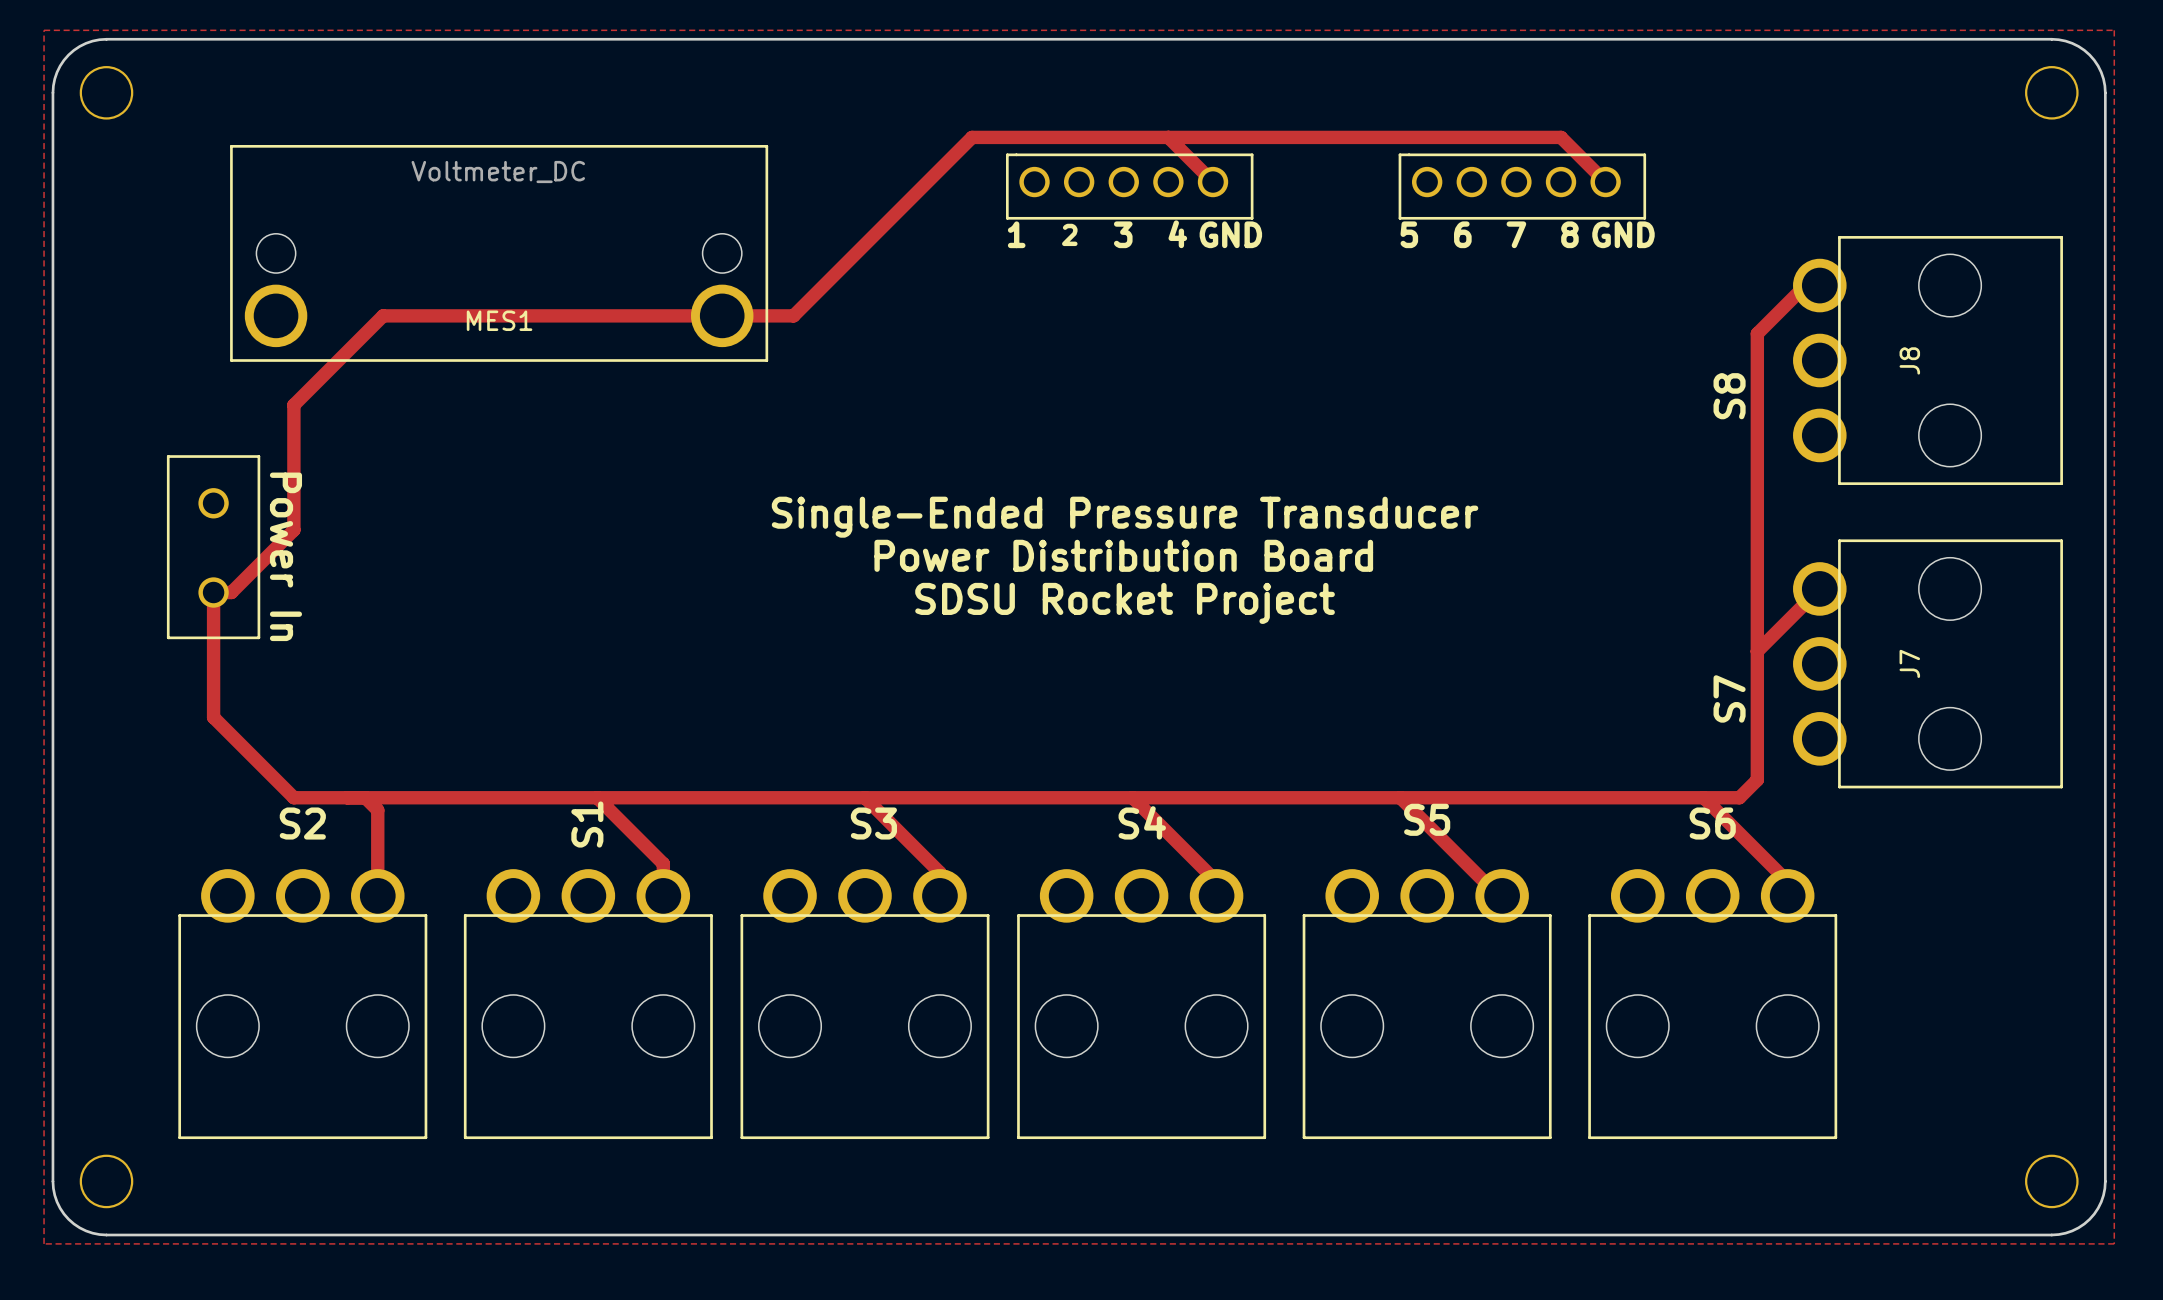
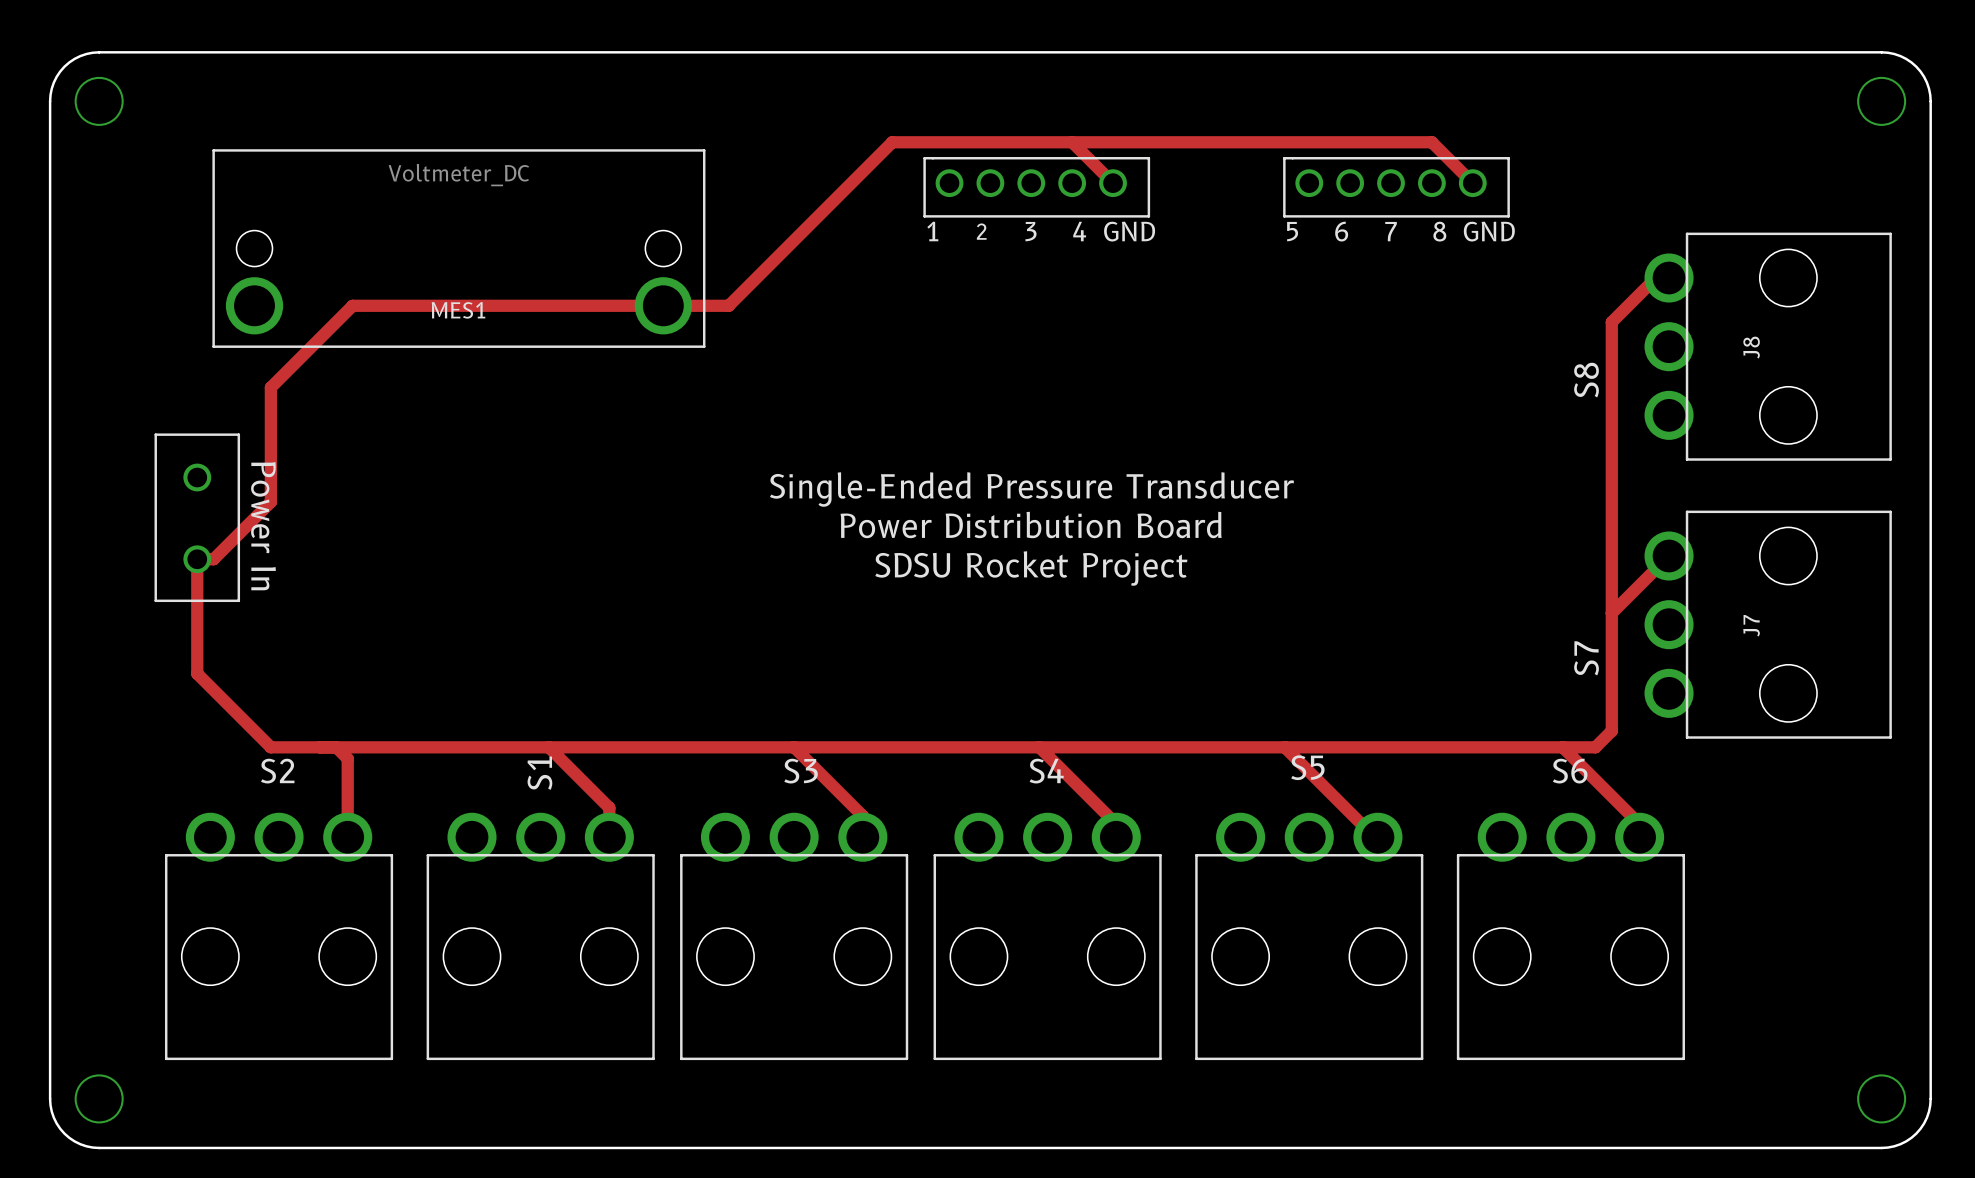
zone outline: (44, 30) (44, 1243) (2114, 1243) (2114, 30) (44, 30) -> none

